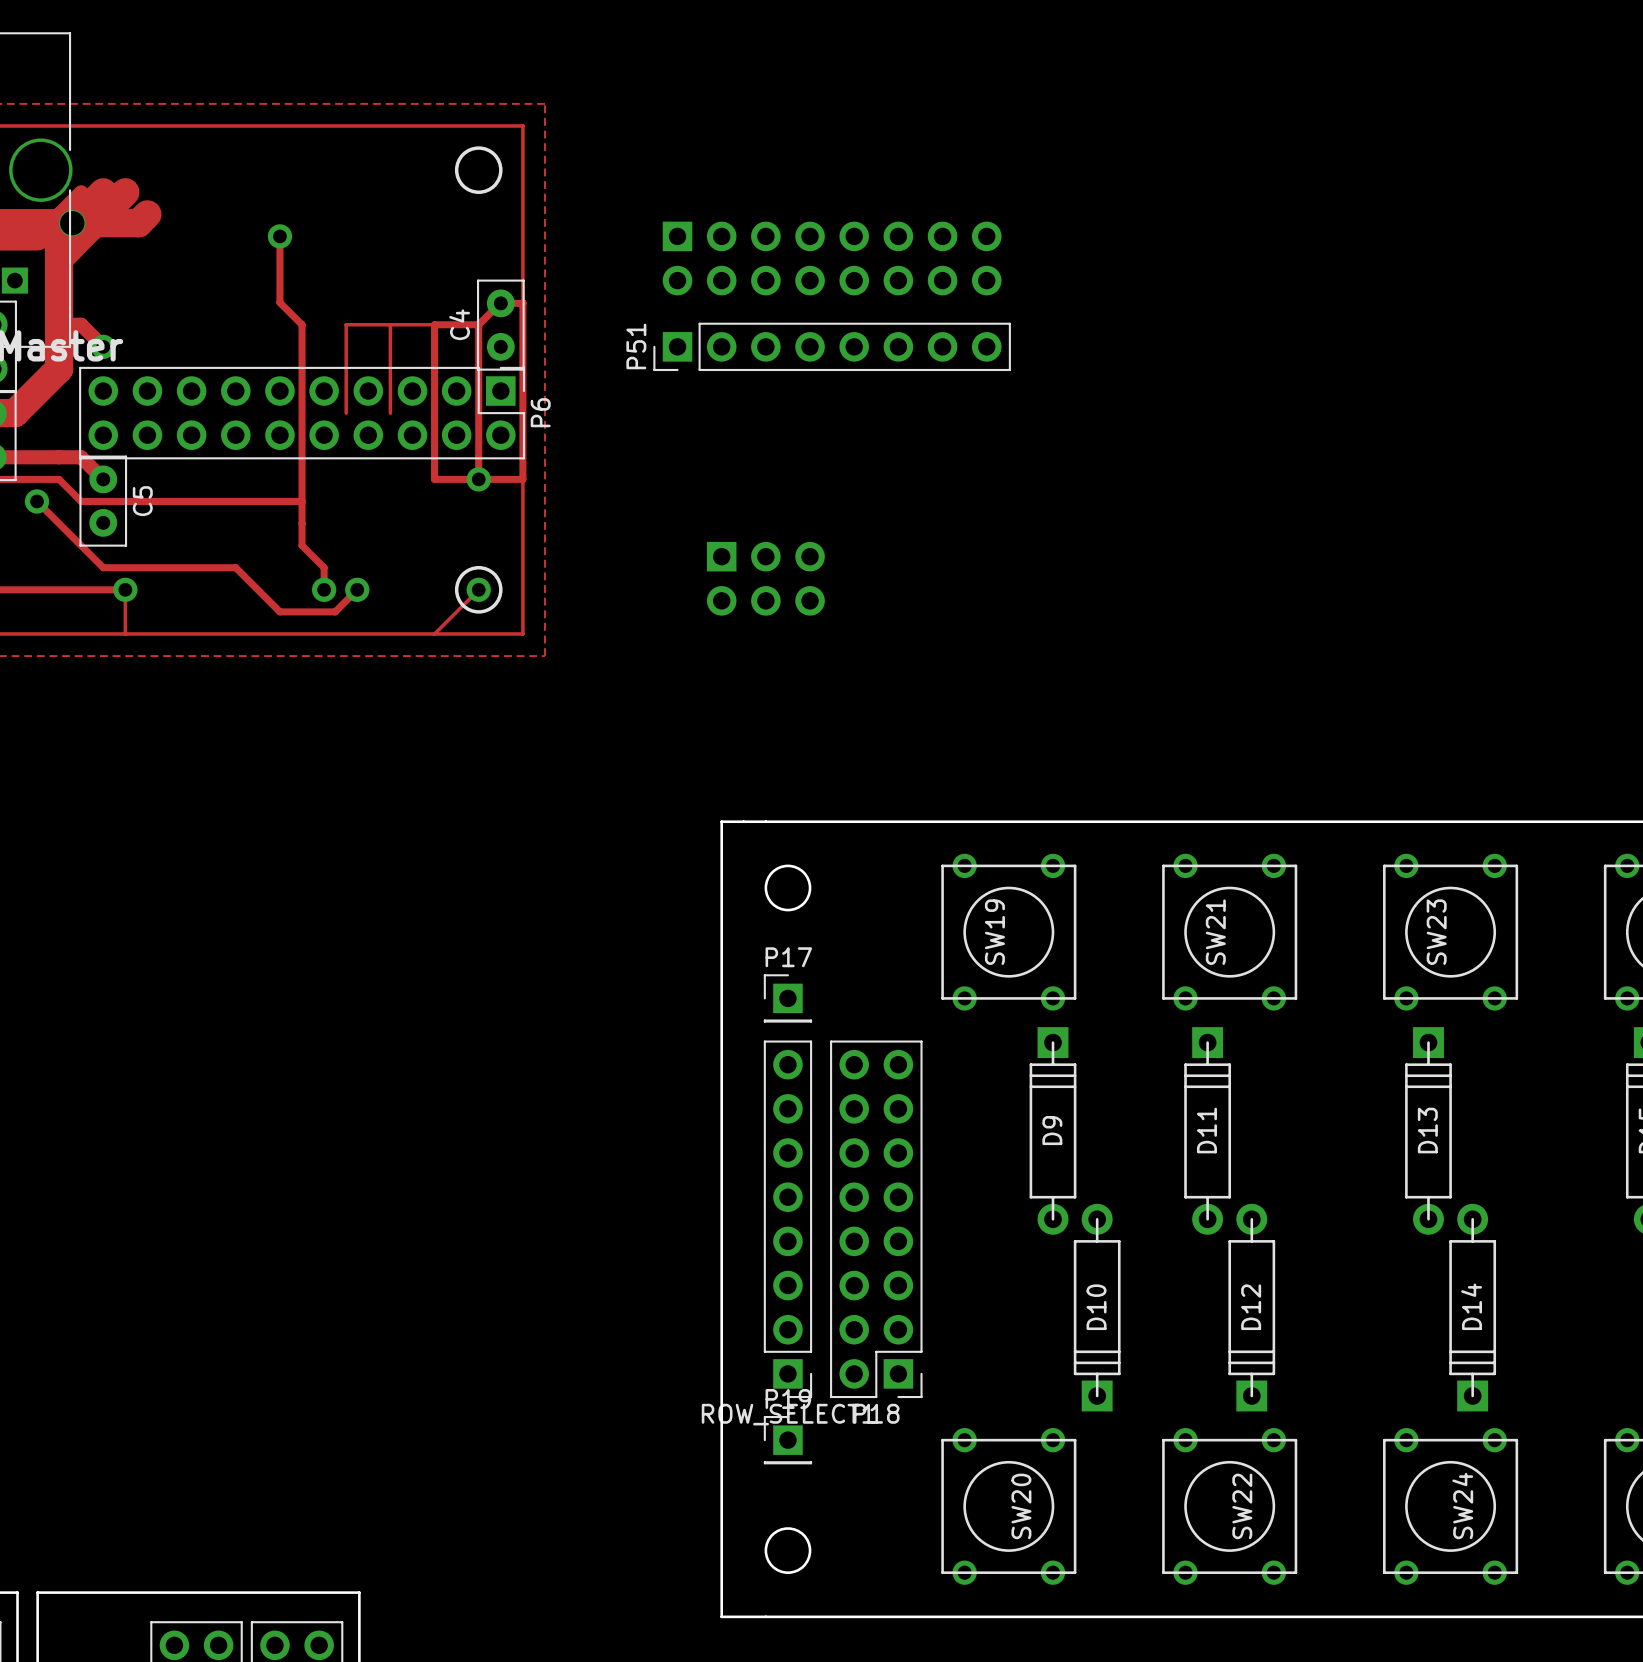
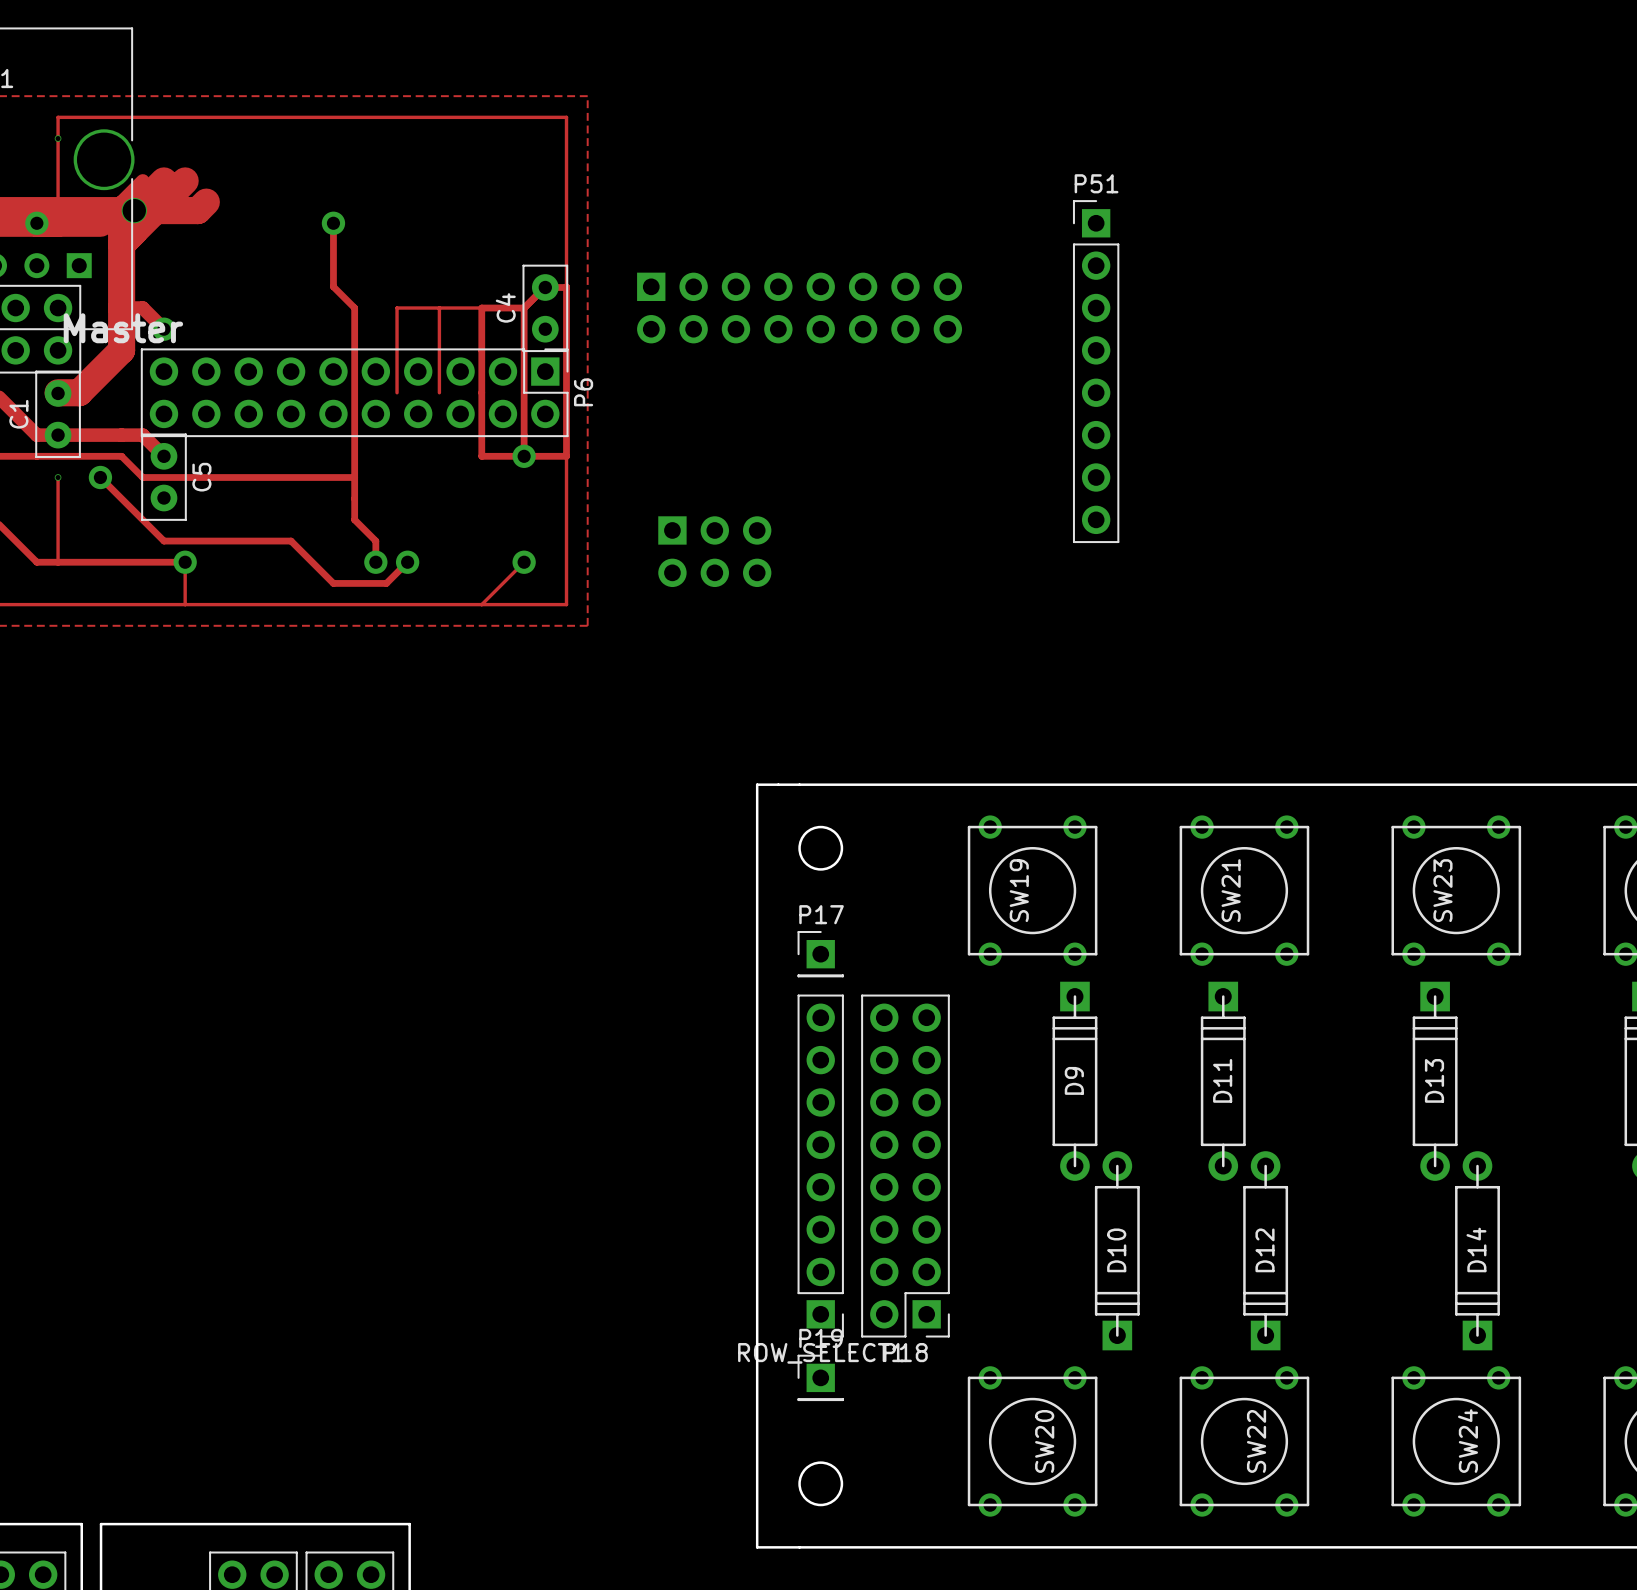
drawing: [454, 146, 503, 194] -> none
part position: (832, 258) -> (799, 308)
P51 rotation: 0° (832, 346) -> 90° clockwise (1096, 371)
P51 position: (832, 346) -> (1096, 371)
drawing: [454, 565, 503, 614] -> none
part position: (765, 578) -> (714, 551)

